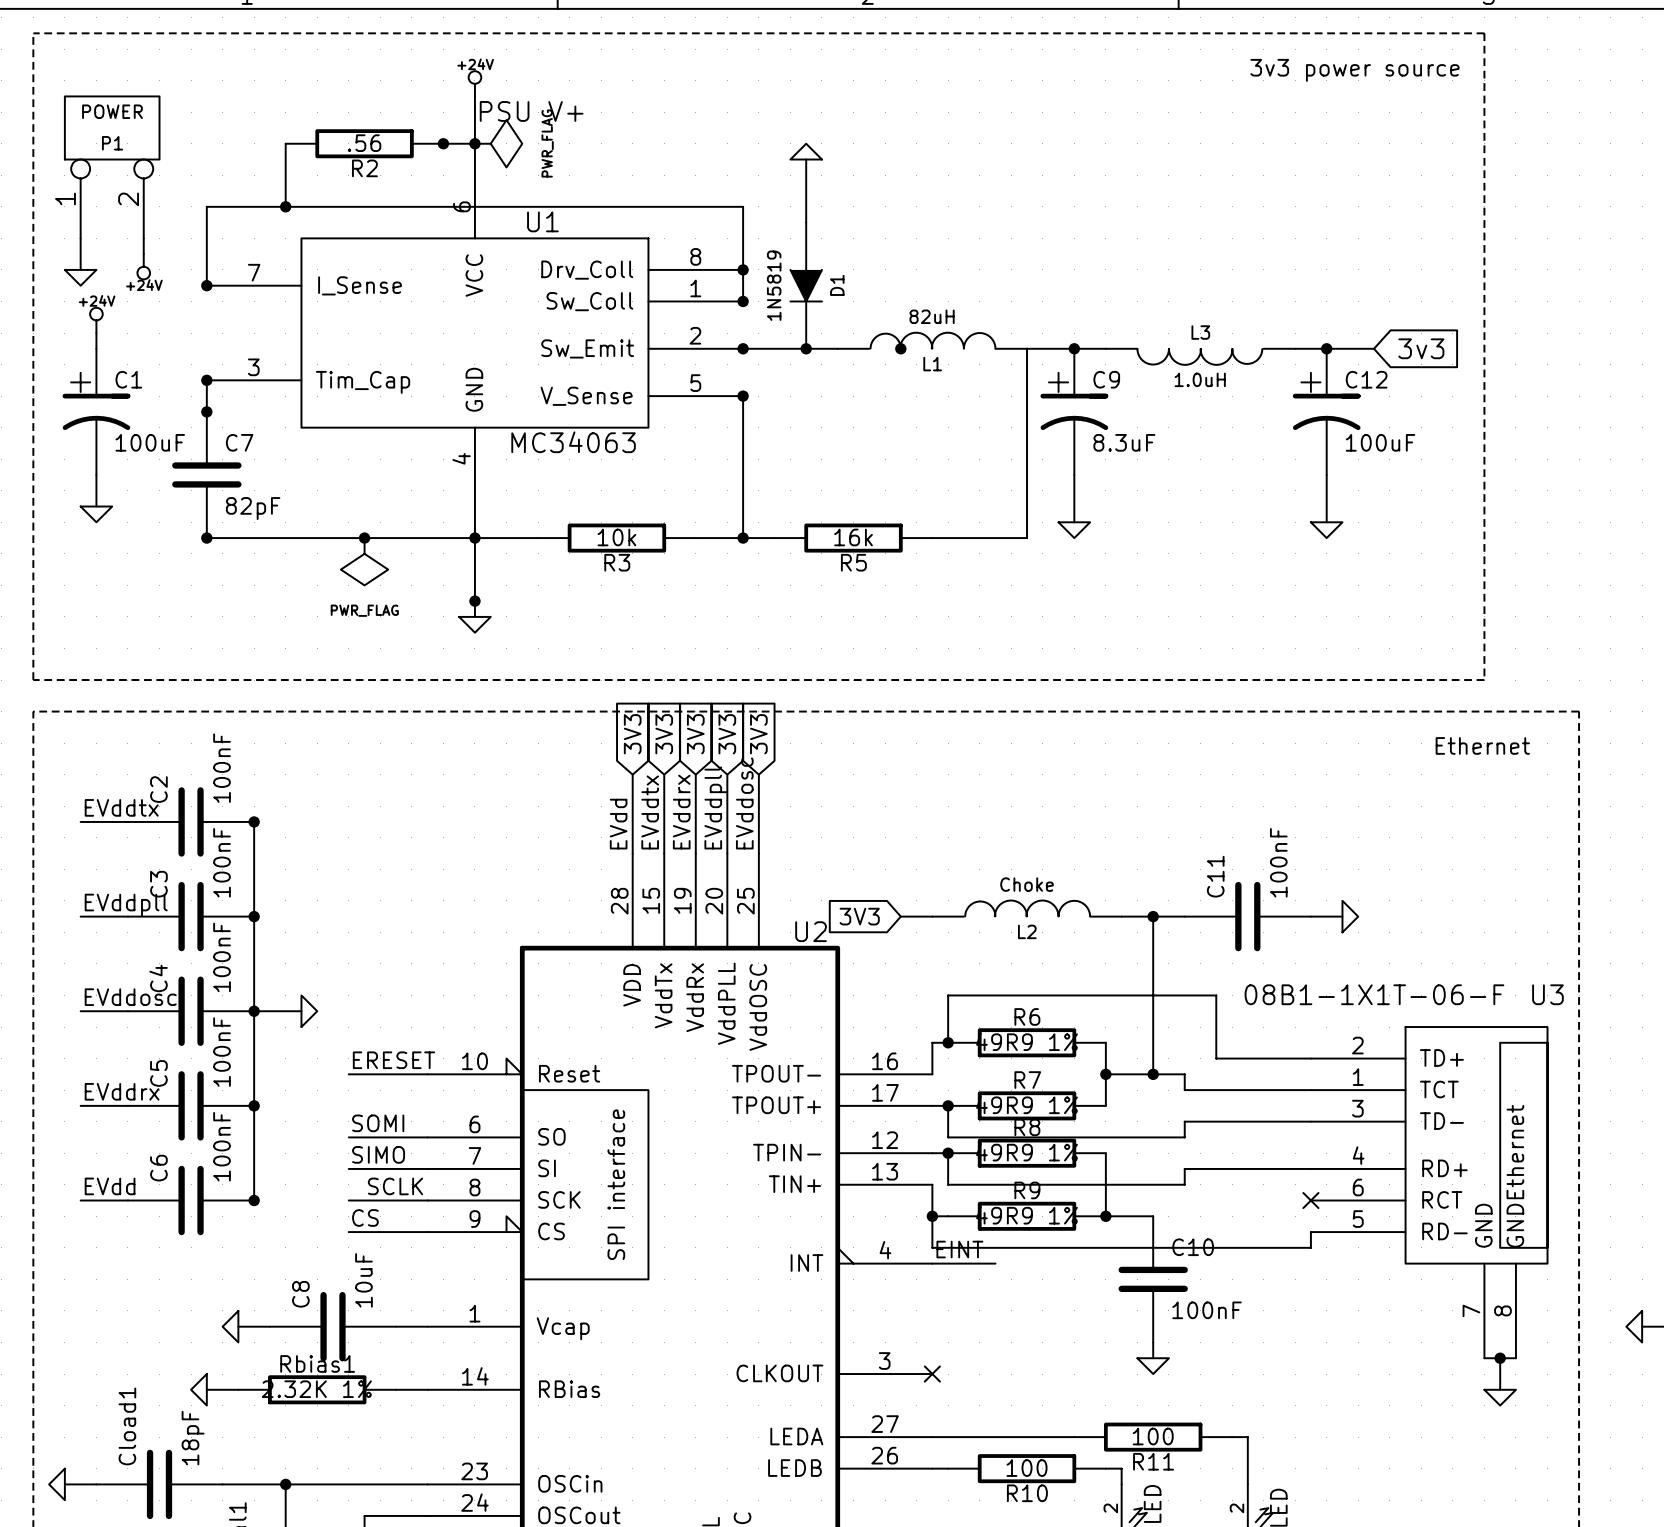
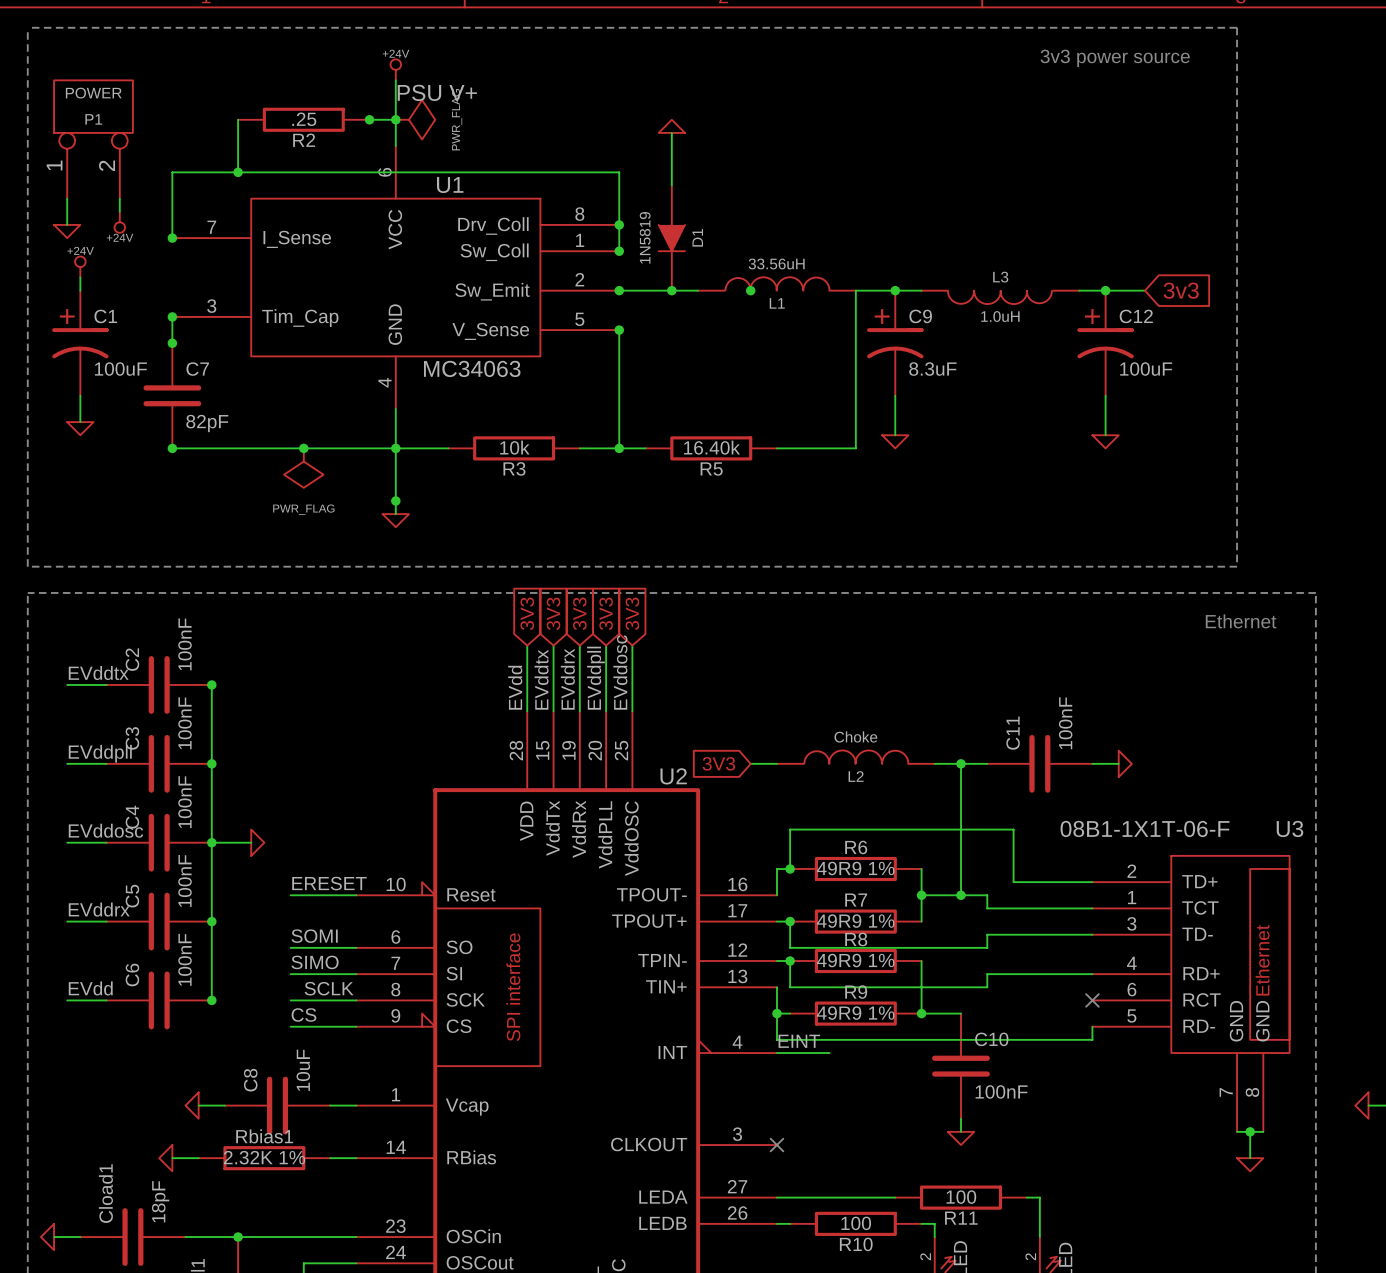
R2 value: .56 (364, 143) -> .25 (304, 119)
L1 value: 82uH (932, 316) -> 33.56uH (776, 263)
R5 value: 16k (853, 537) -> 16.40k (712, 447)

